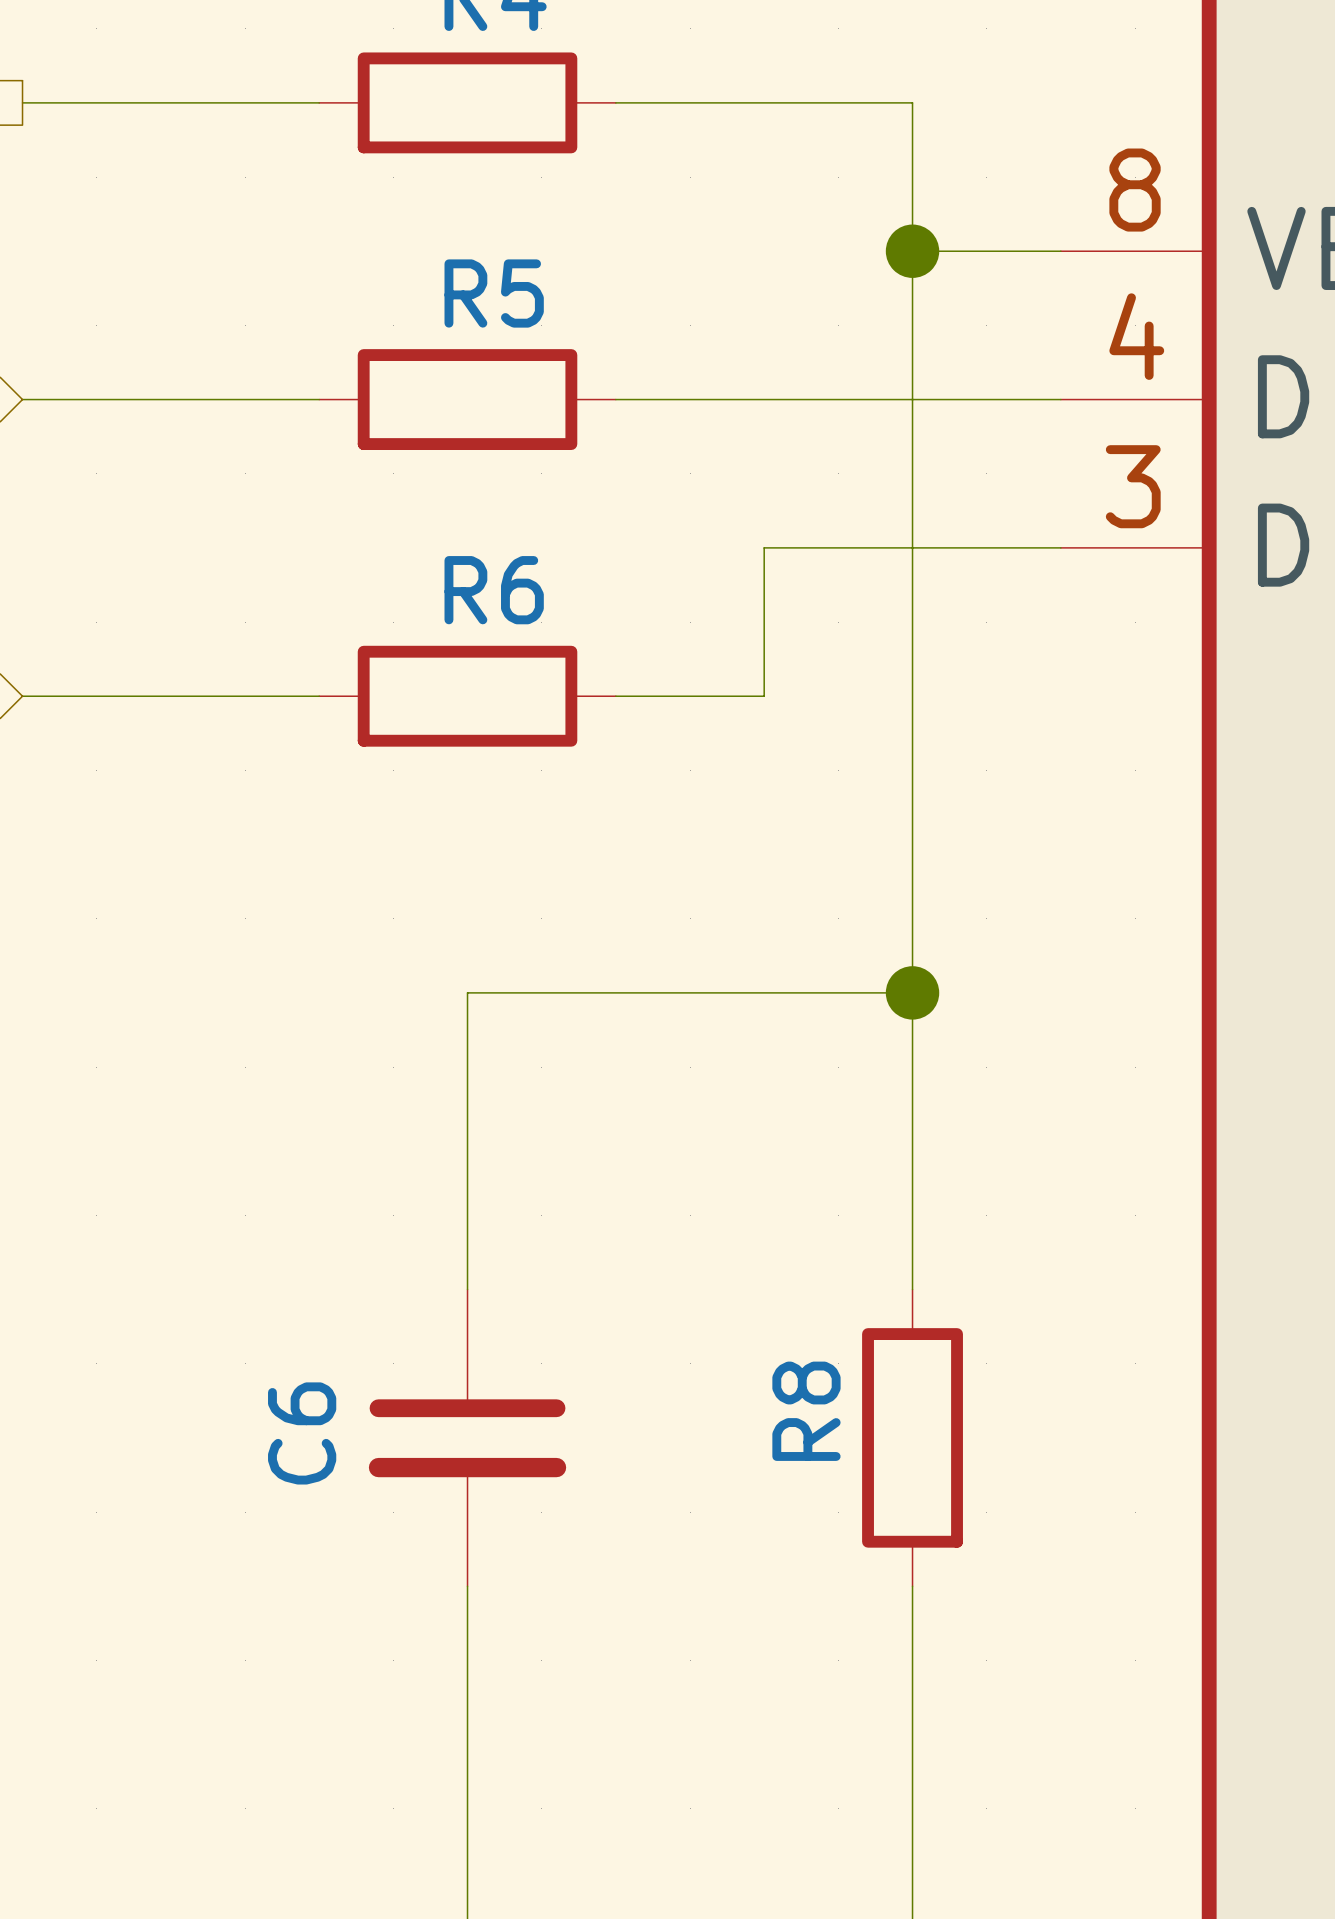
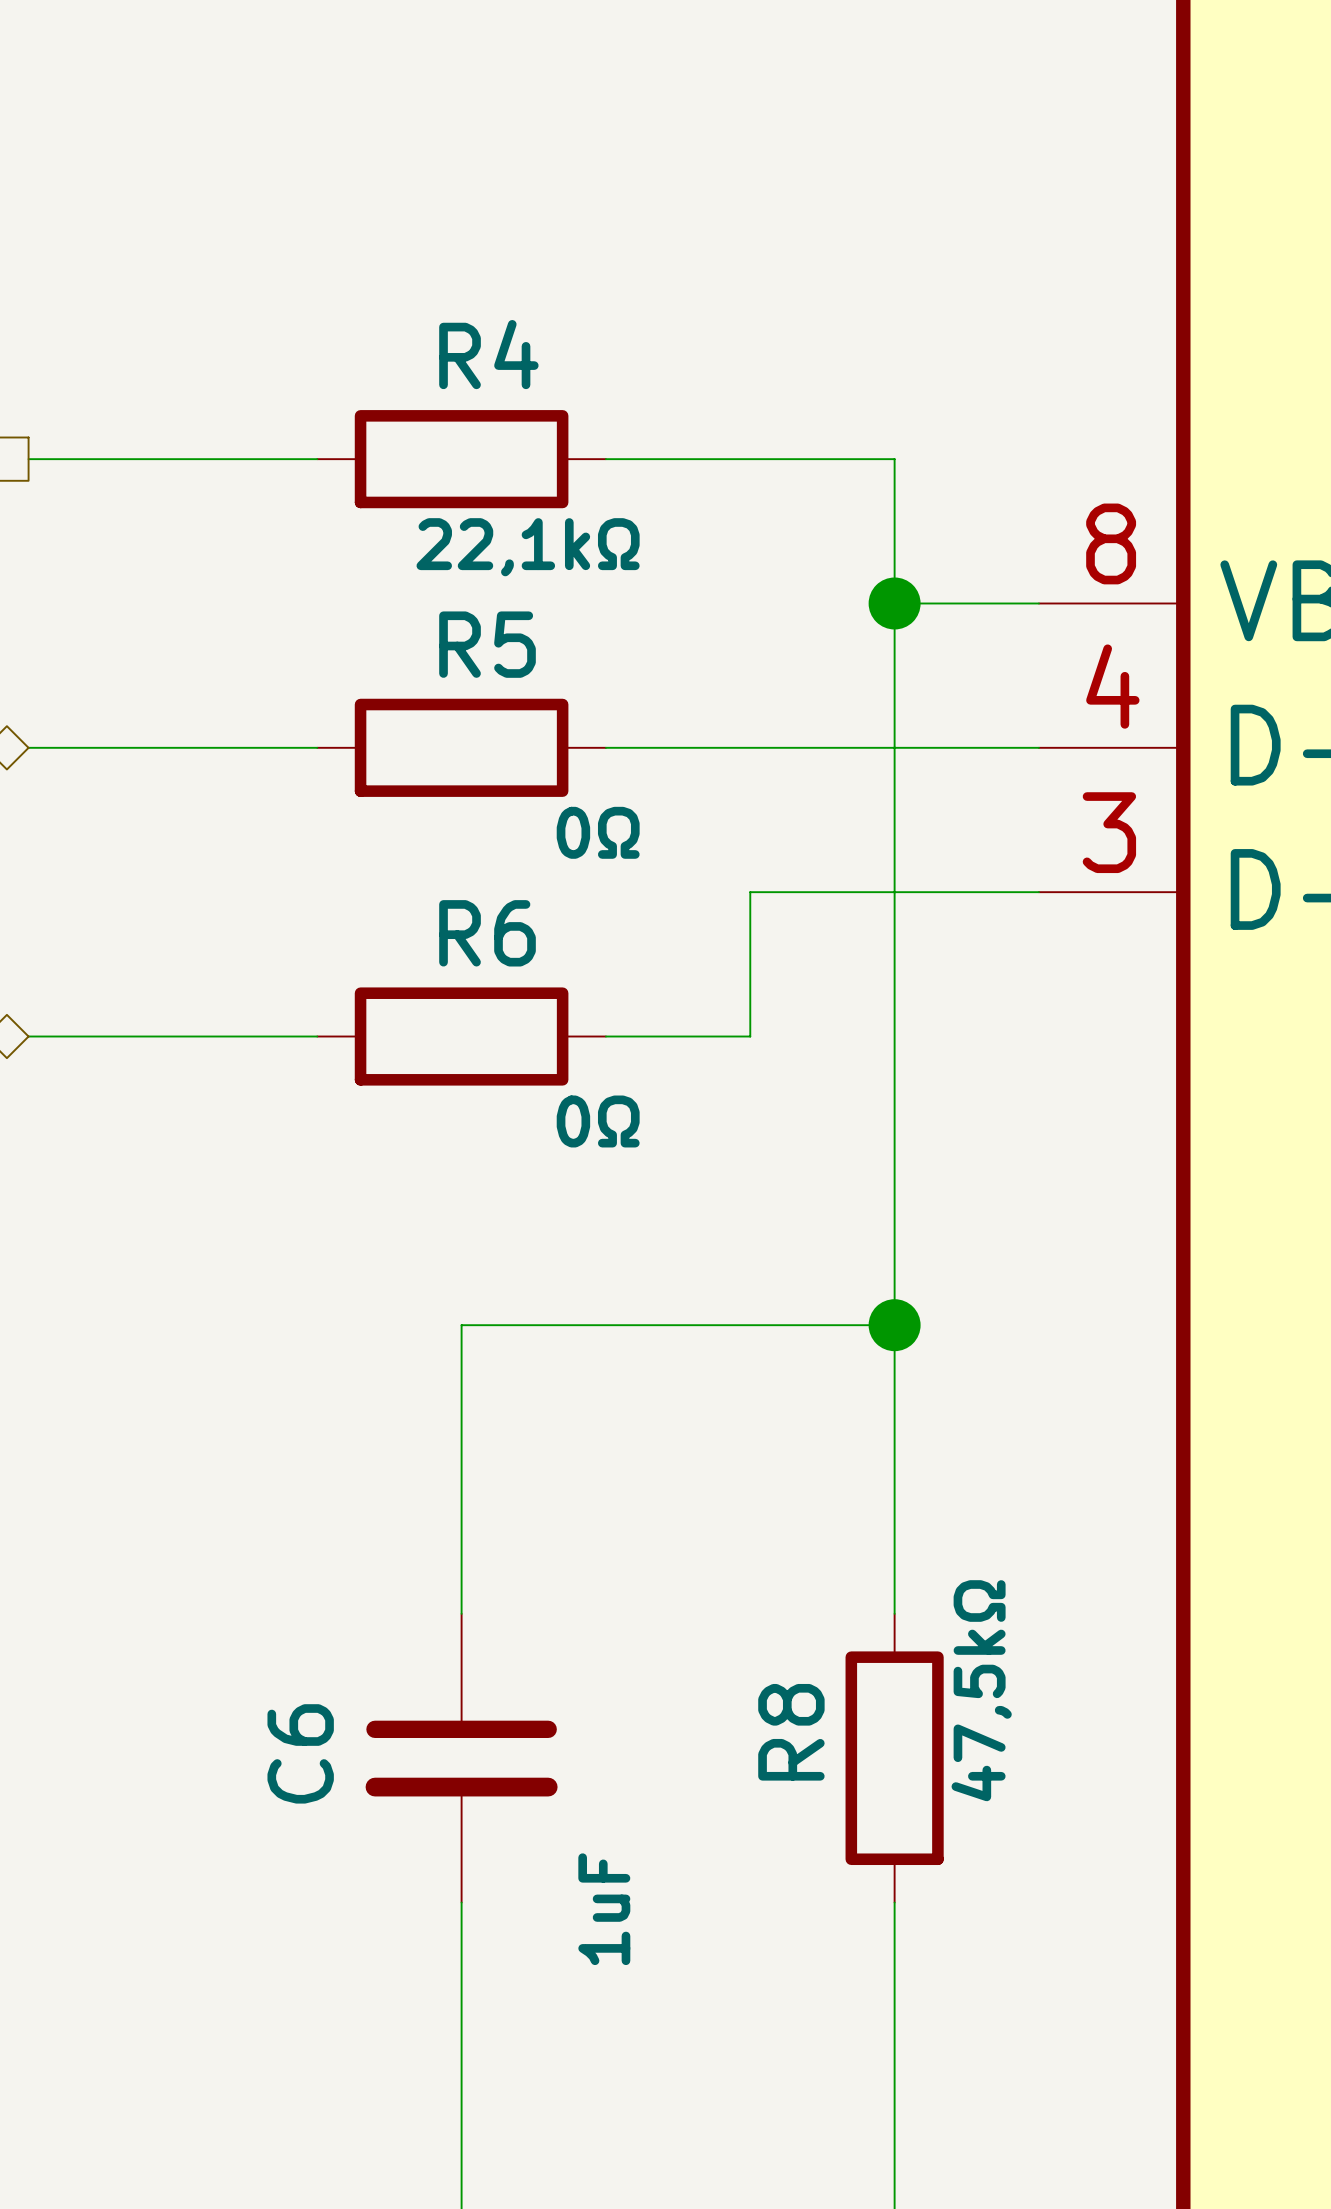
R4 value: none -> 22,1kΩ (528, 547)
R5 value: none -> 0Ω (598, 832)
R6 value: none -> 0Ω (598, 1121)
R8 value: none -> 47,5kΩ (981, 1690)
C6 value: none -> 1uF (604, 1909)

